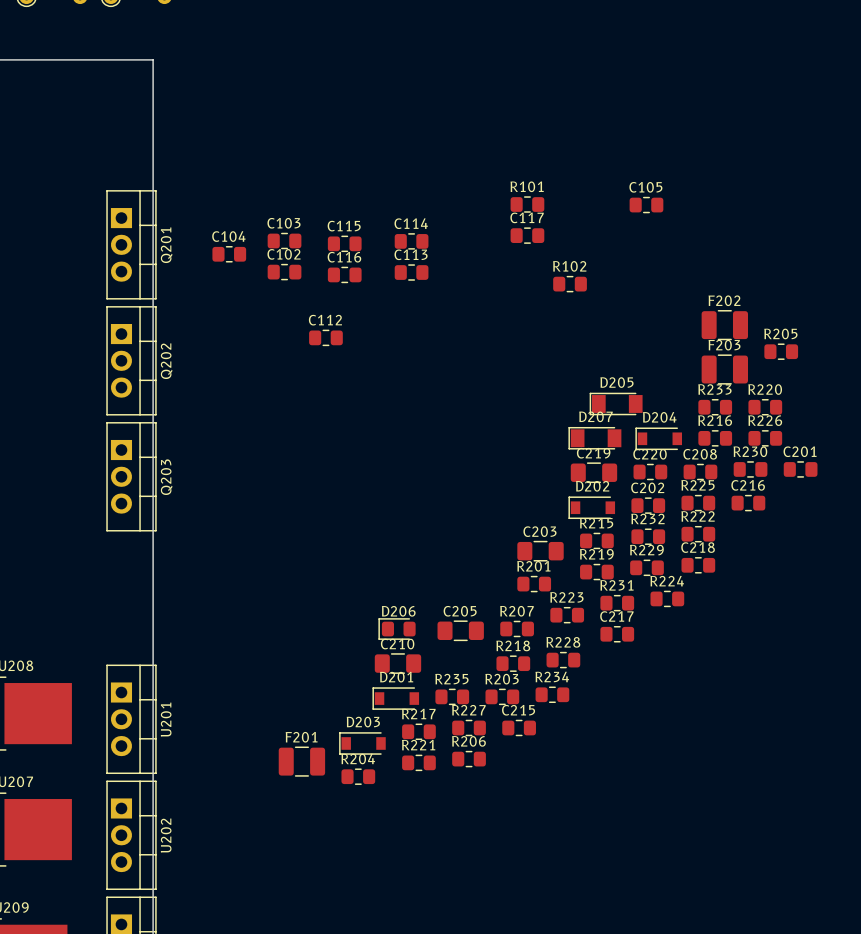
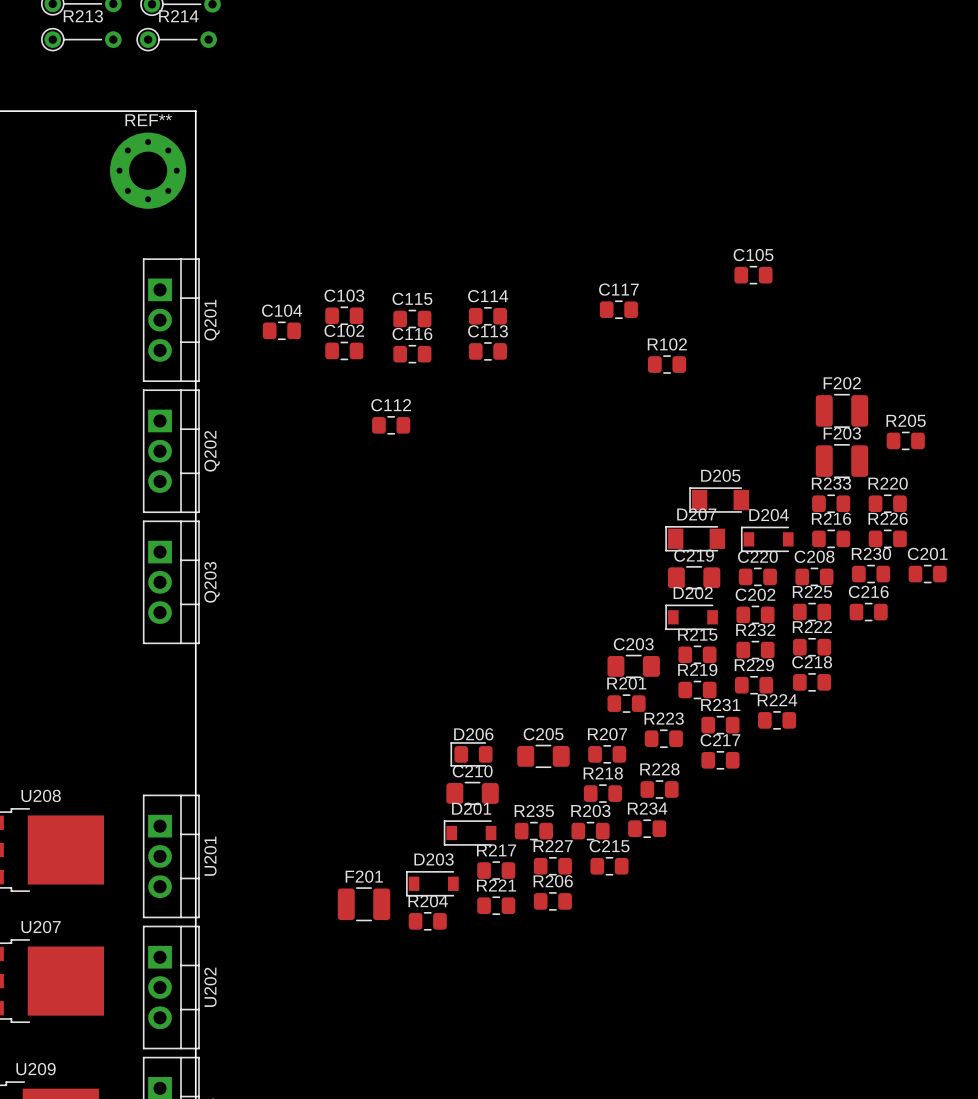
REF**: none -> (148, 170)
R101: (527, 204) -> none

